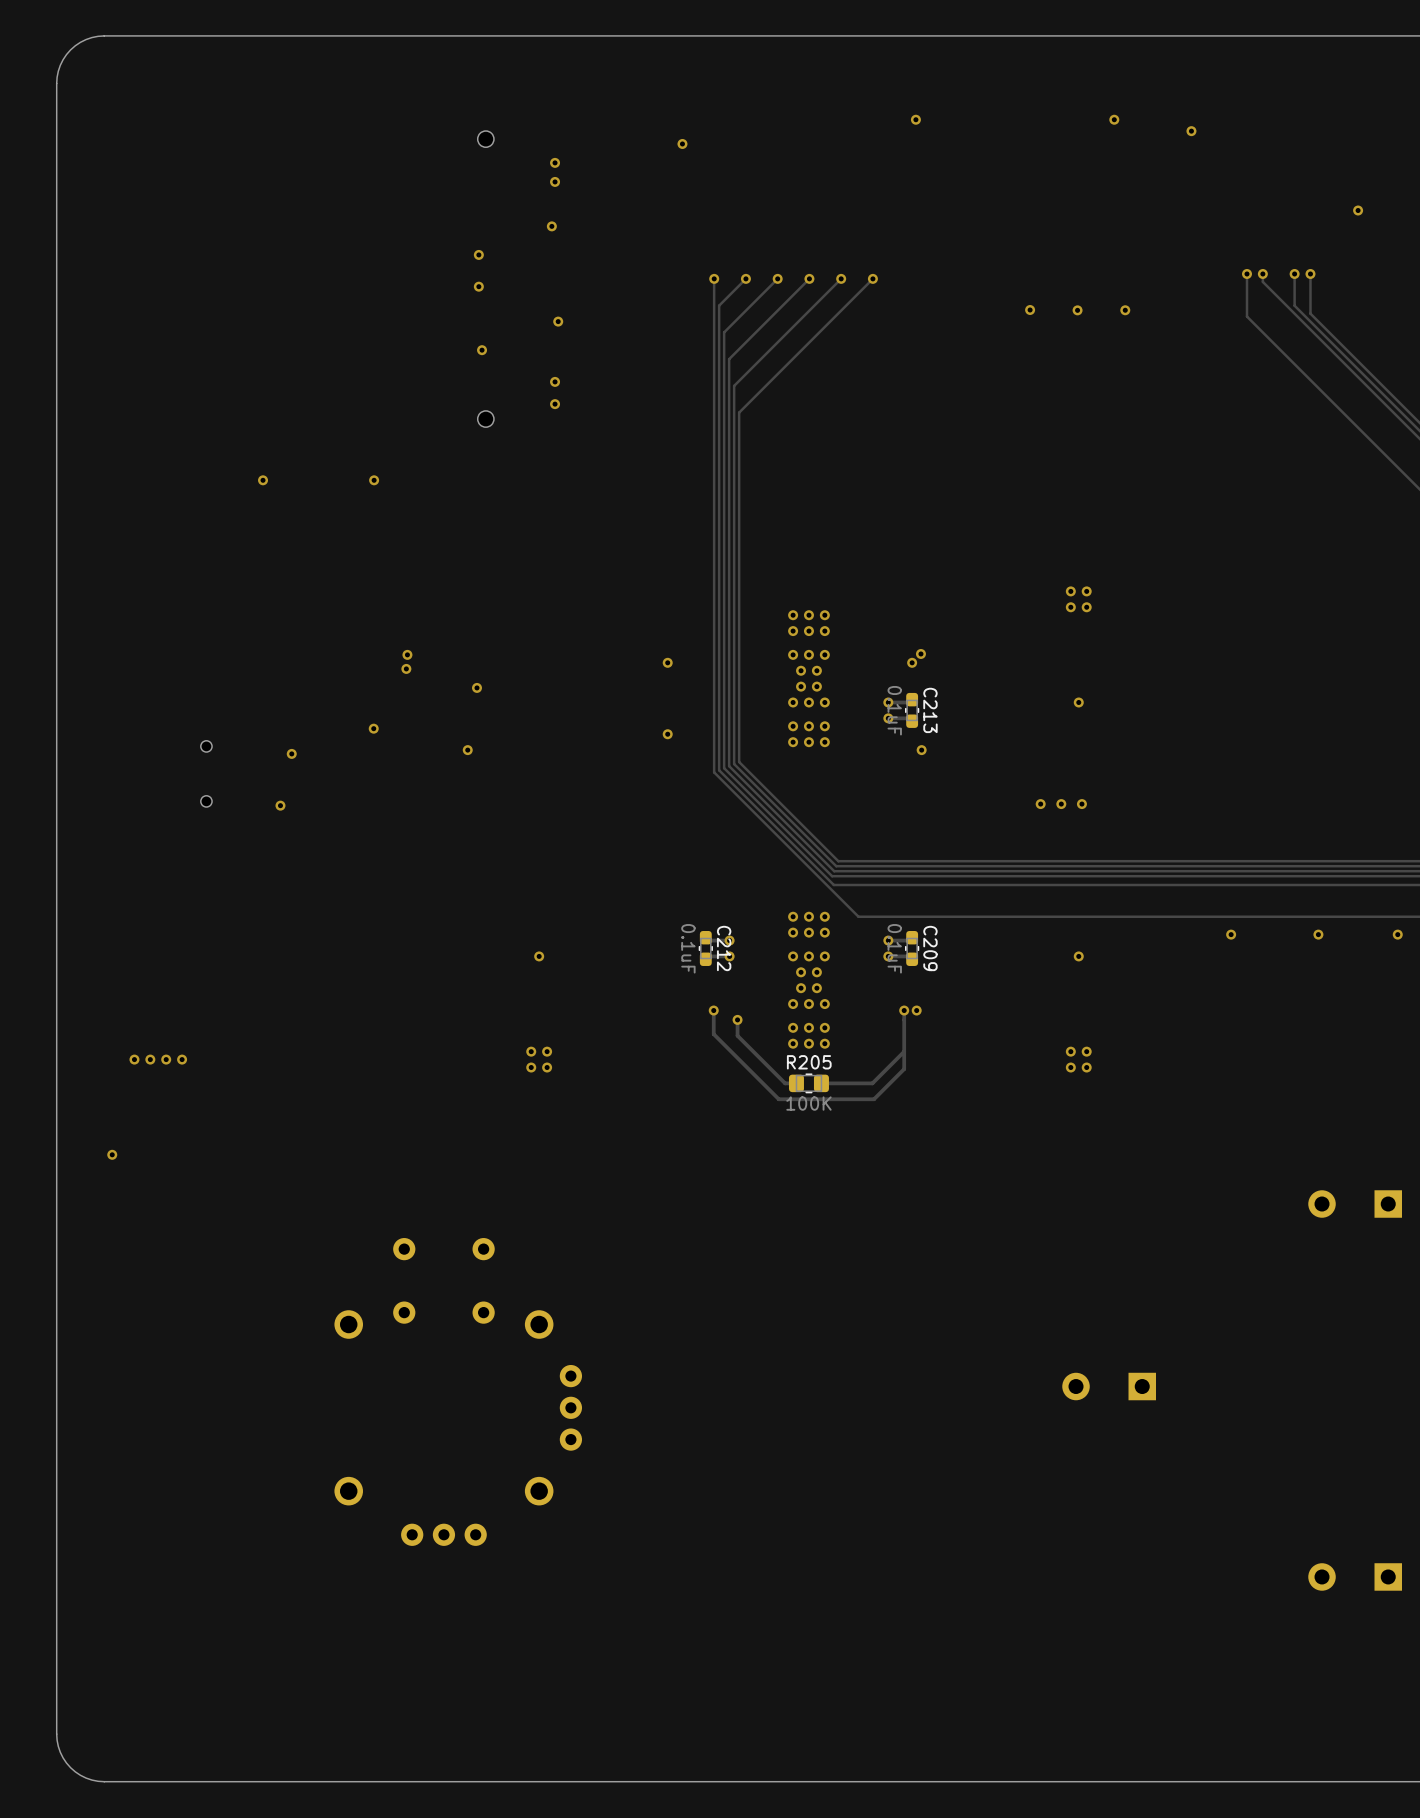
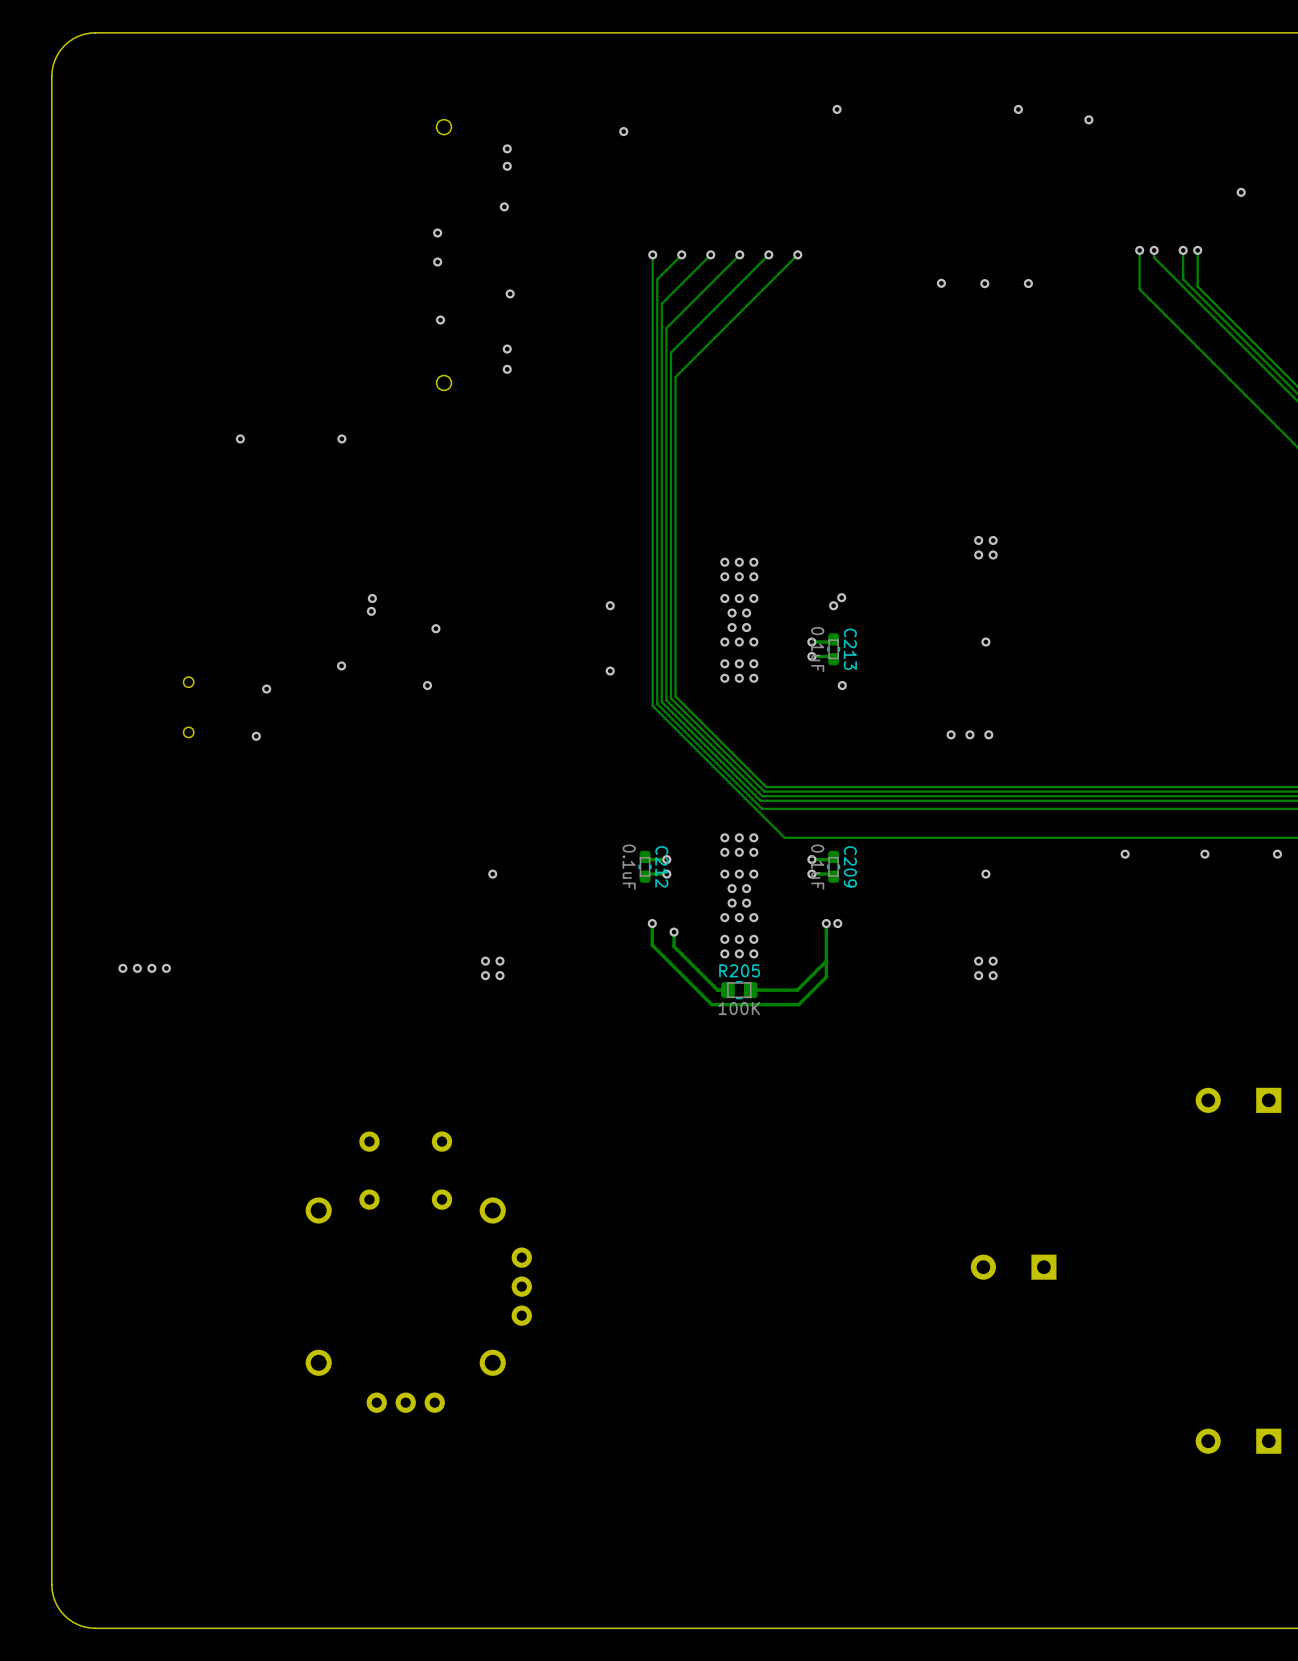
via: (112, 1154) -> none

